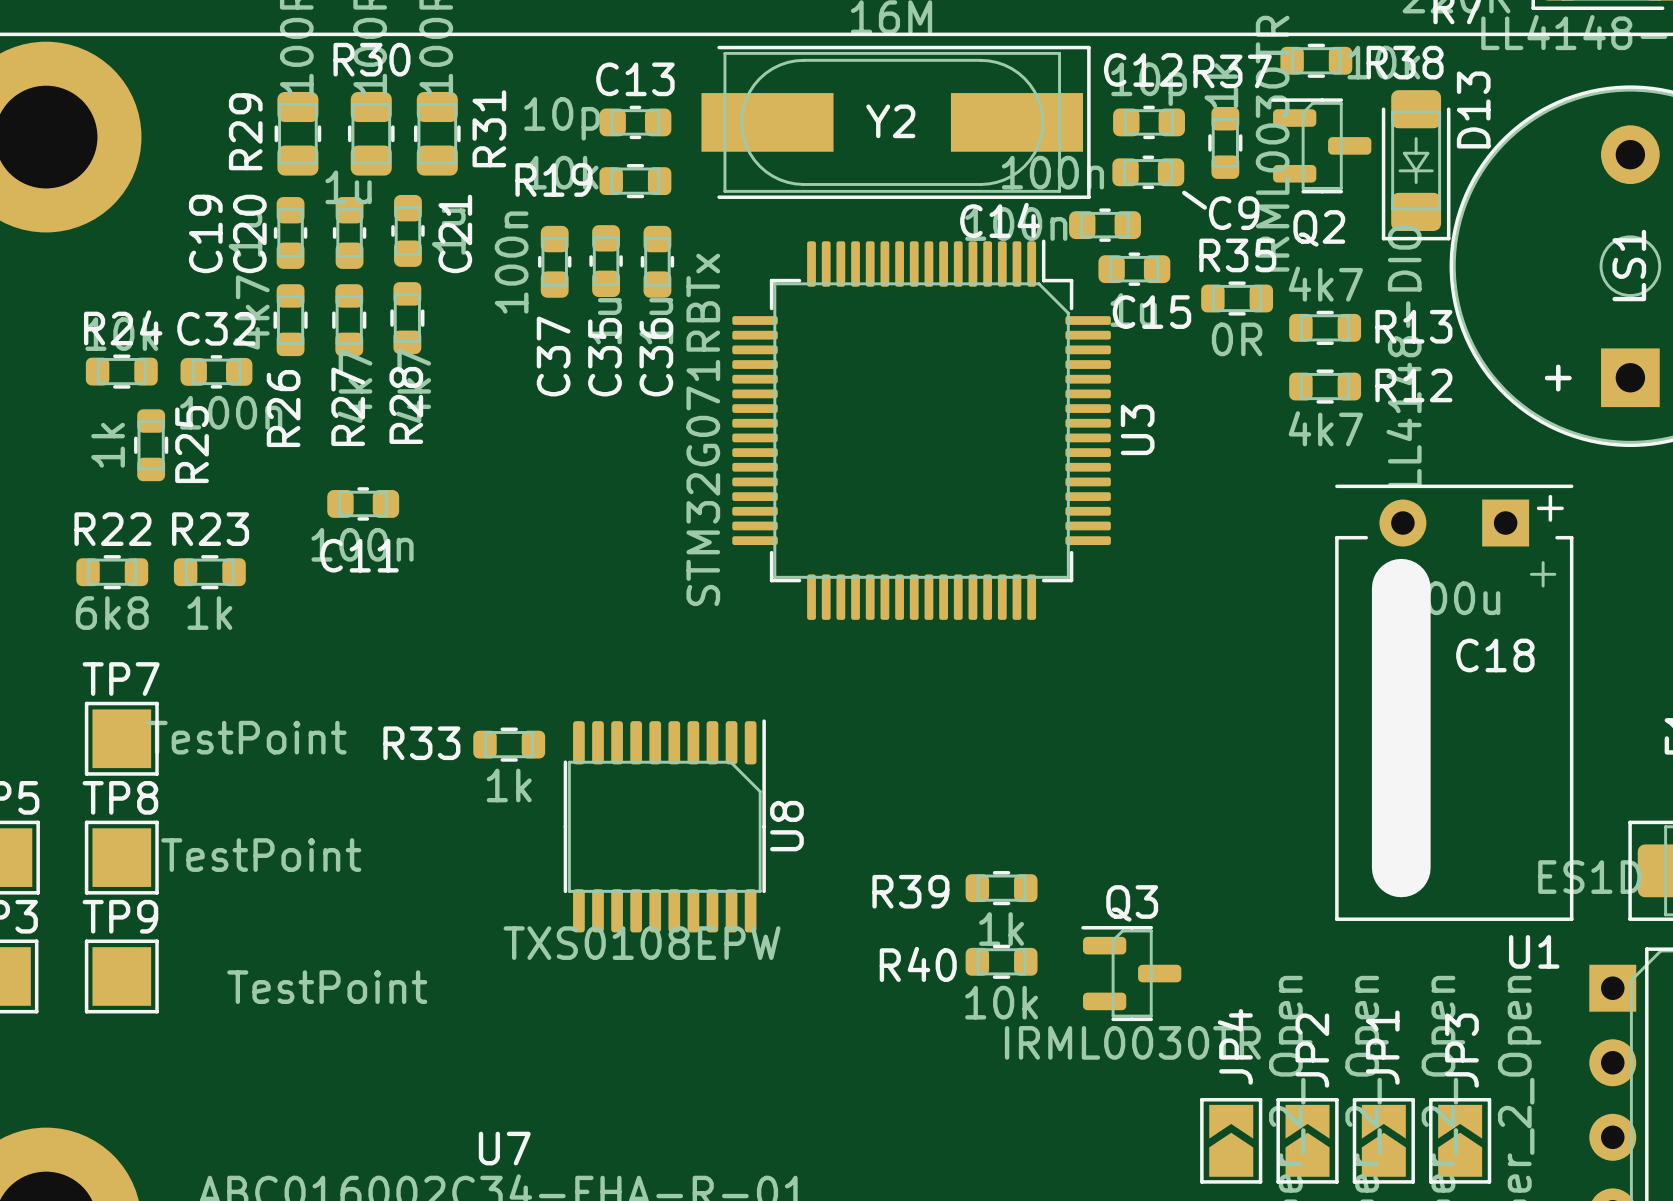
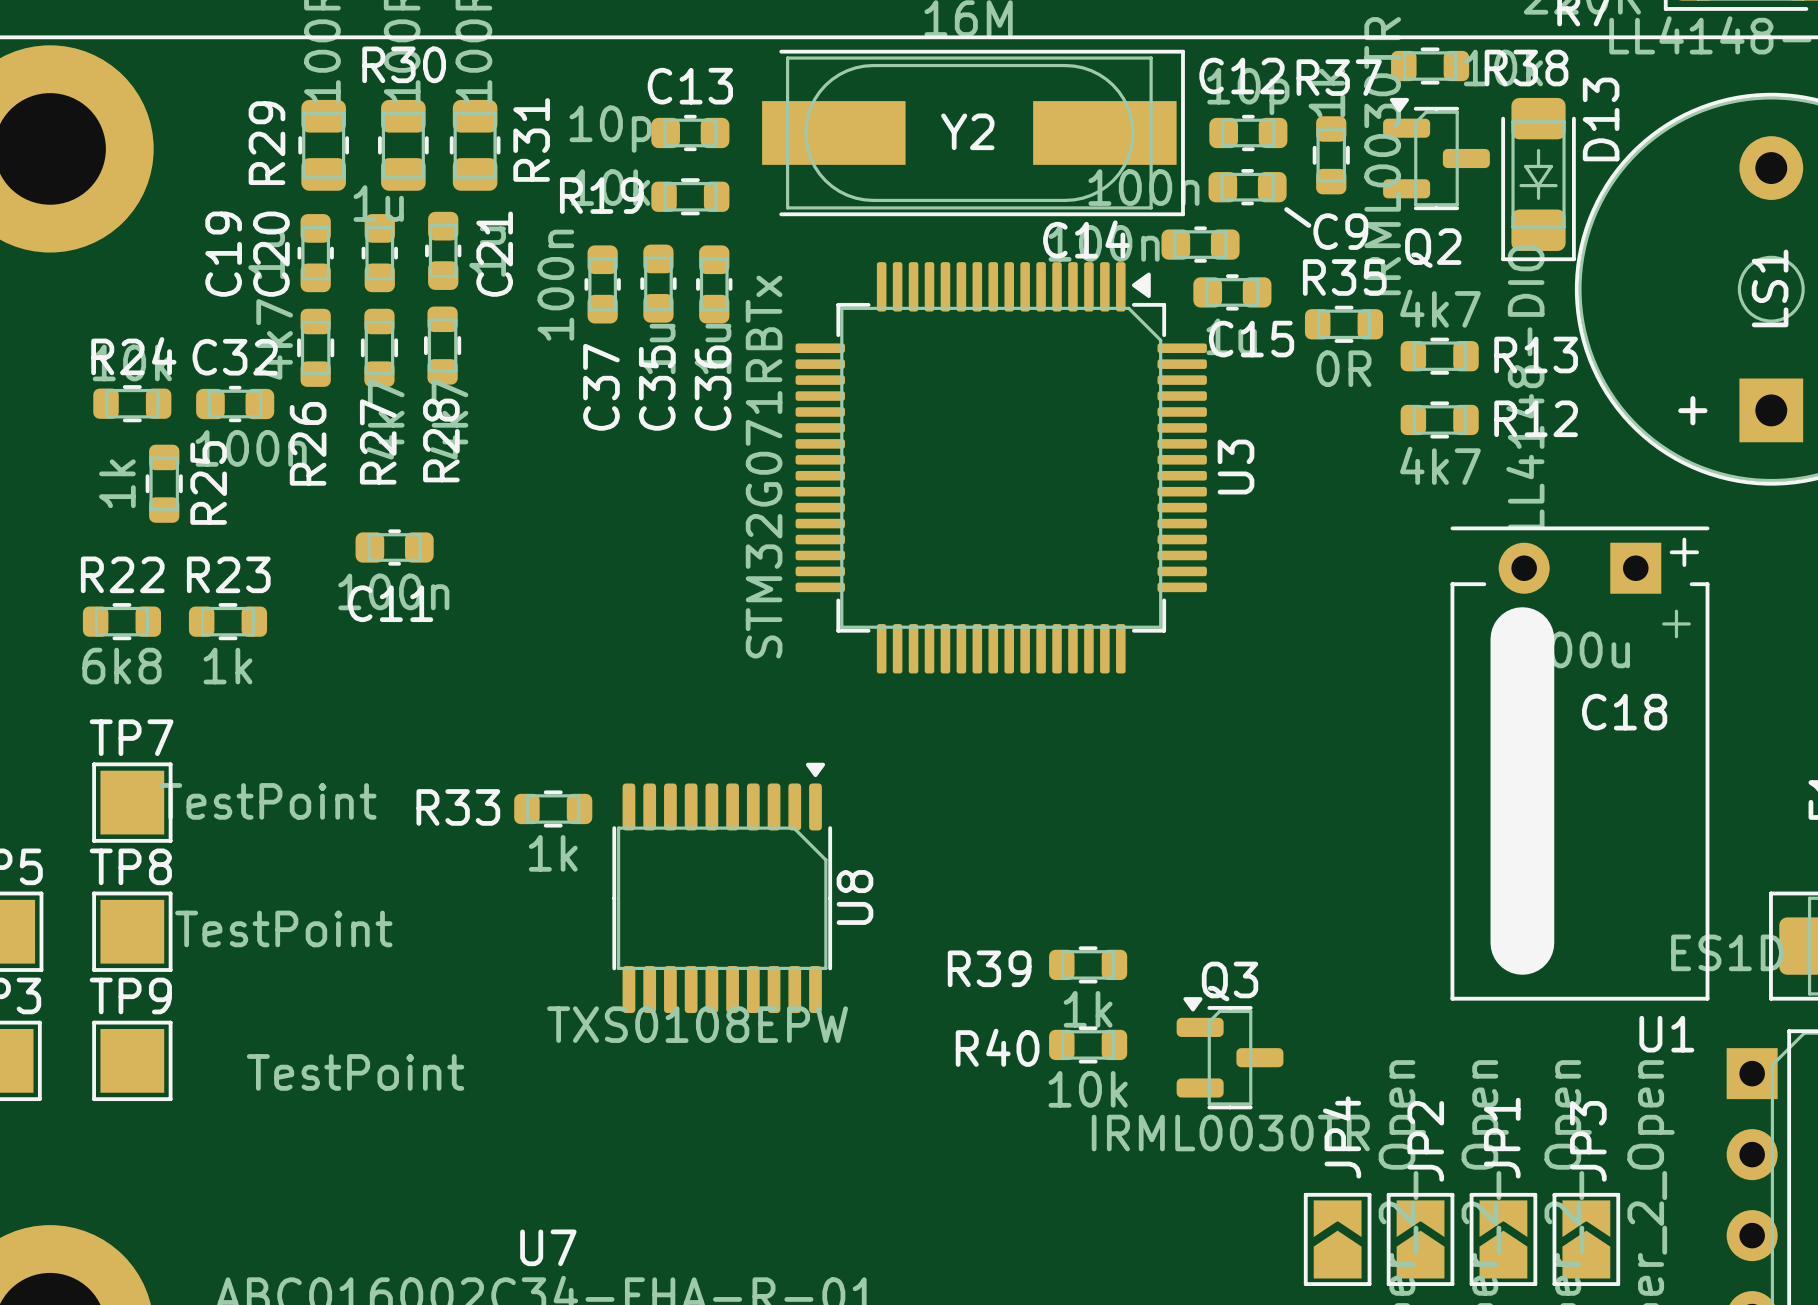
Q2 footprint: [1271, 98, 1372, 194] -> [1383, 97, 1490, 211]
U3 footprint: [732, 239, 1111, 620] -> [795, 262, 1207, 674]
U8 footprint: [563, 719, 766, 933] -> [612, 762, 833, 1014]
Q3 footprint: [1081, 926, 1182, 1022] -> [1176, 997, 1284, 1110]

